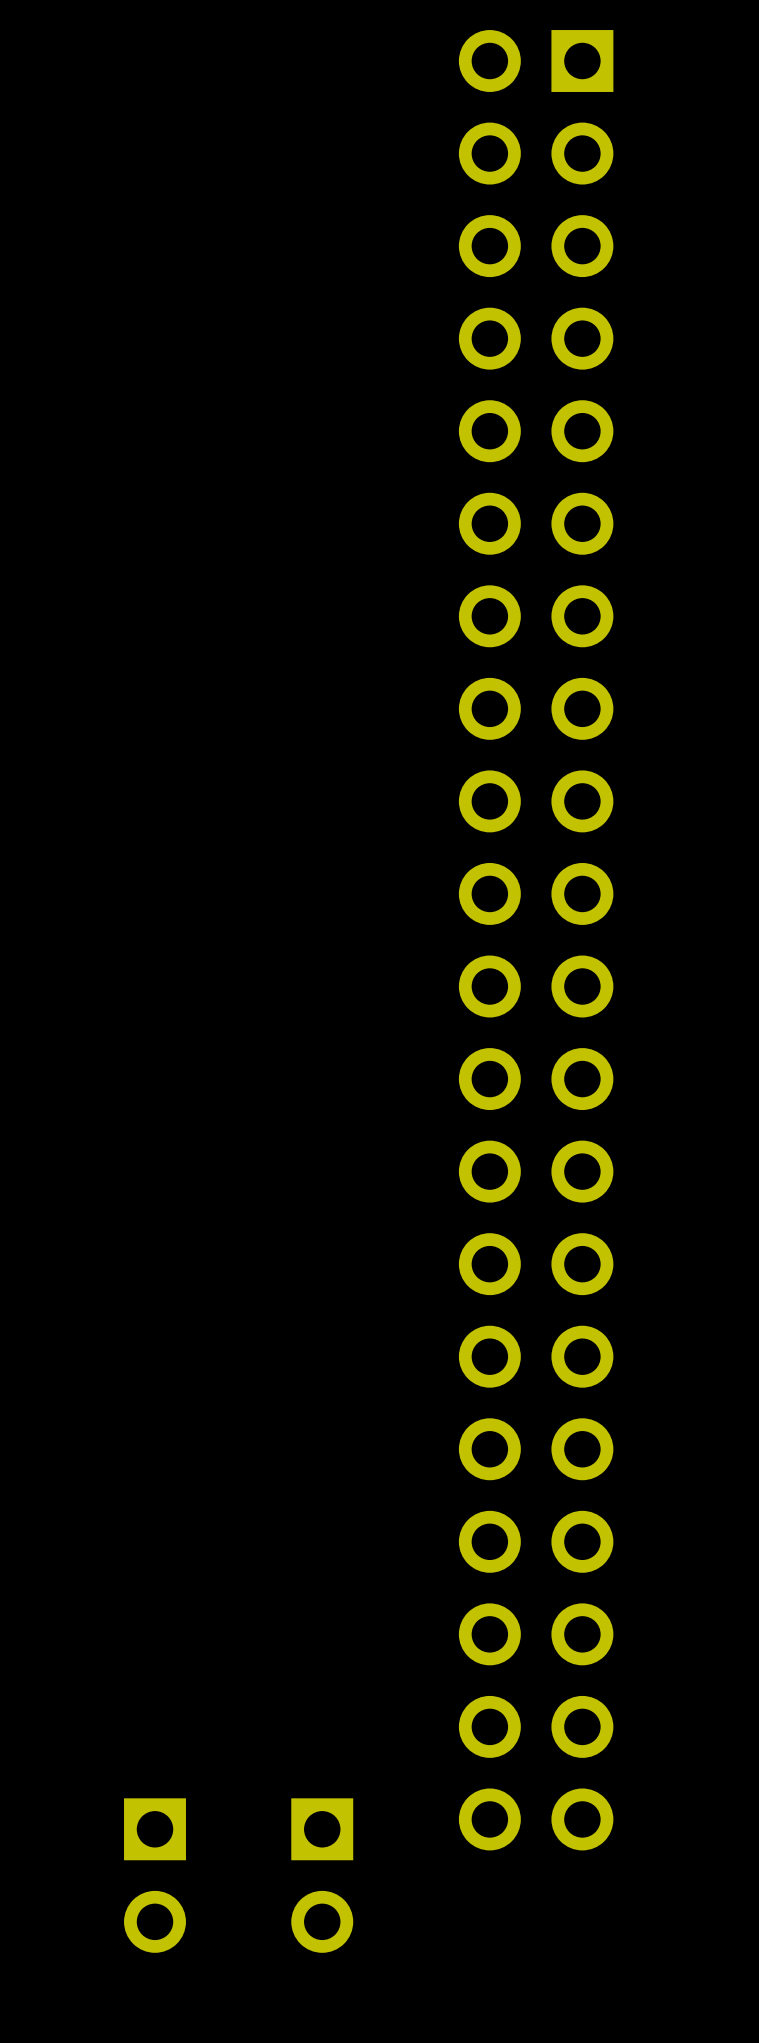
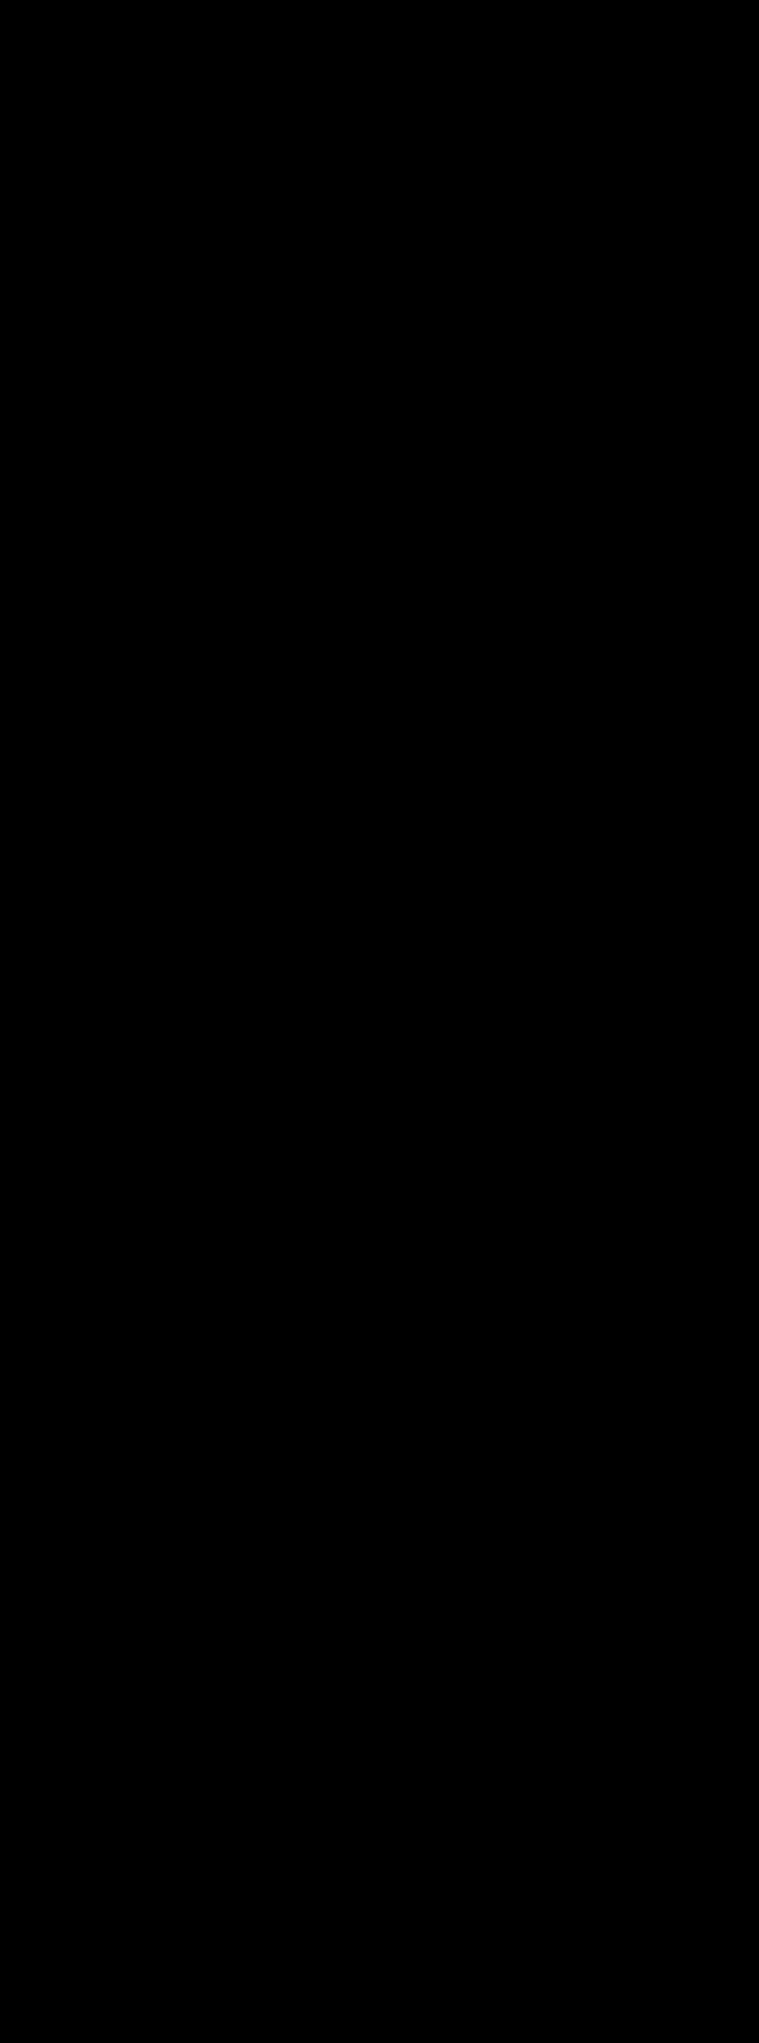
part: (536, 940) -> none
part: (155, 1875) -> none
part: (322, 1875) -> none

